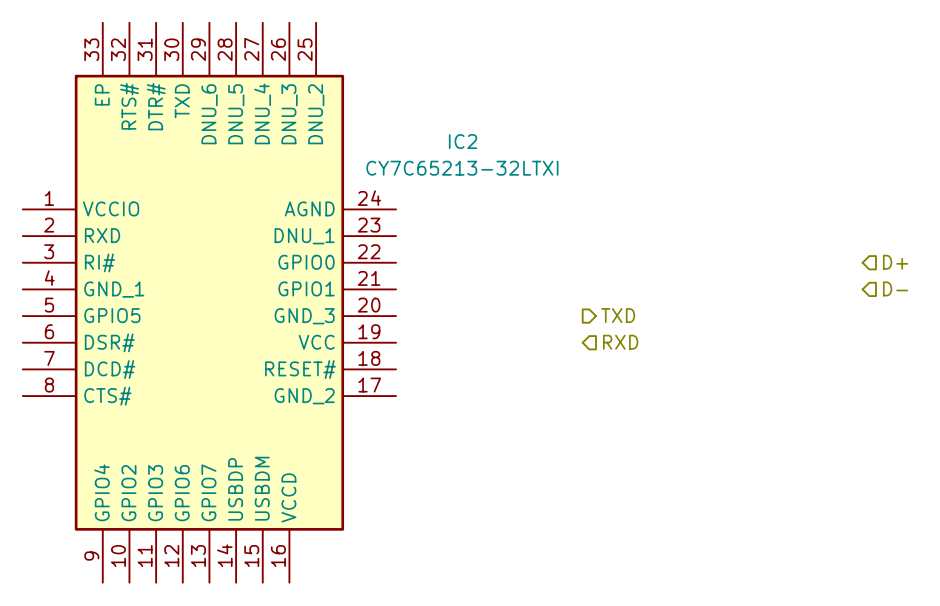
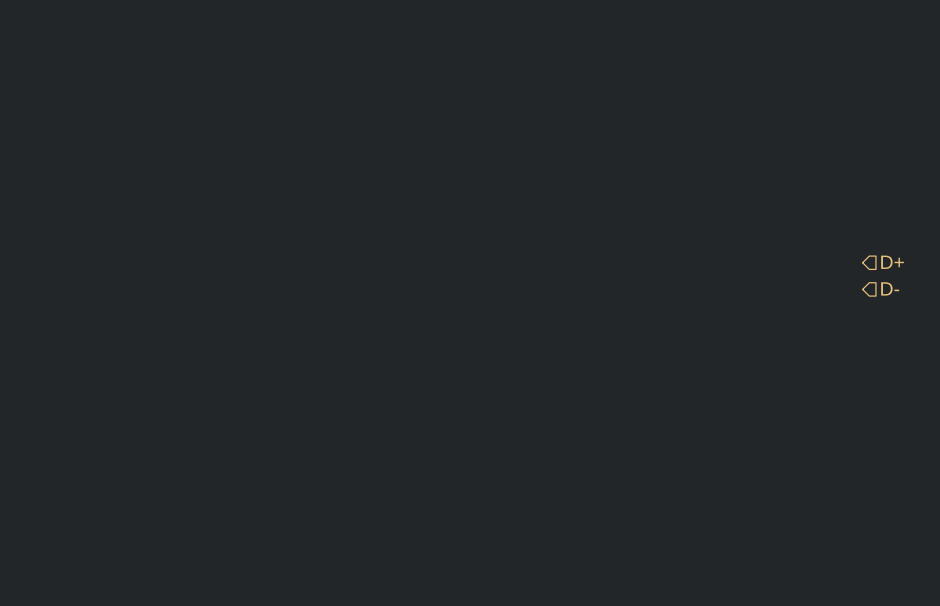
IC2: CY7C65213-32LTXI (209, 302) -> none
hierarchical label: TXD (618, 315) -> none
hierarchical label: RXD (620, 342) -> none

